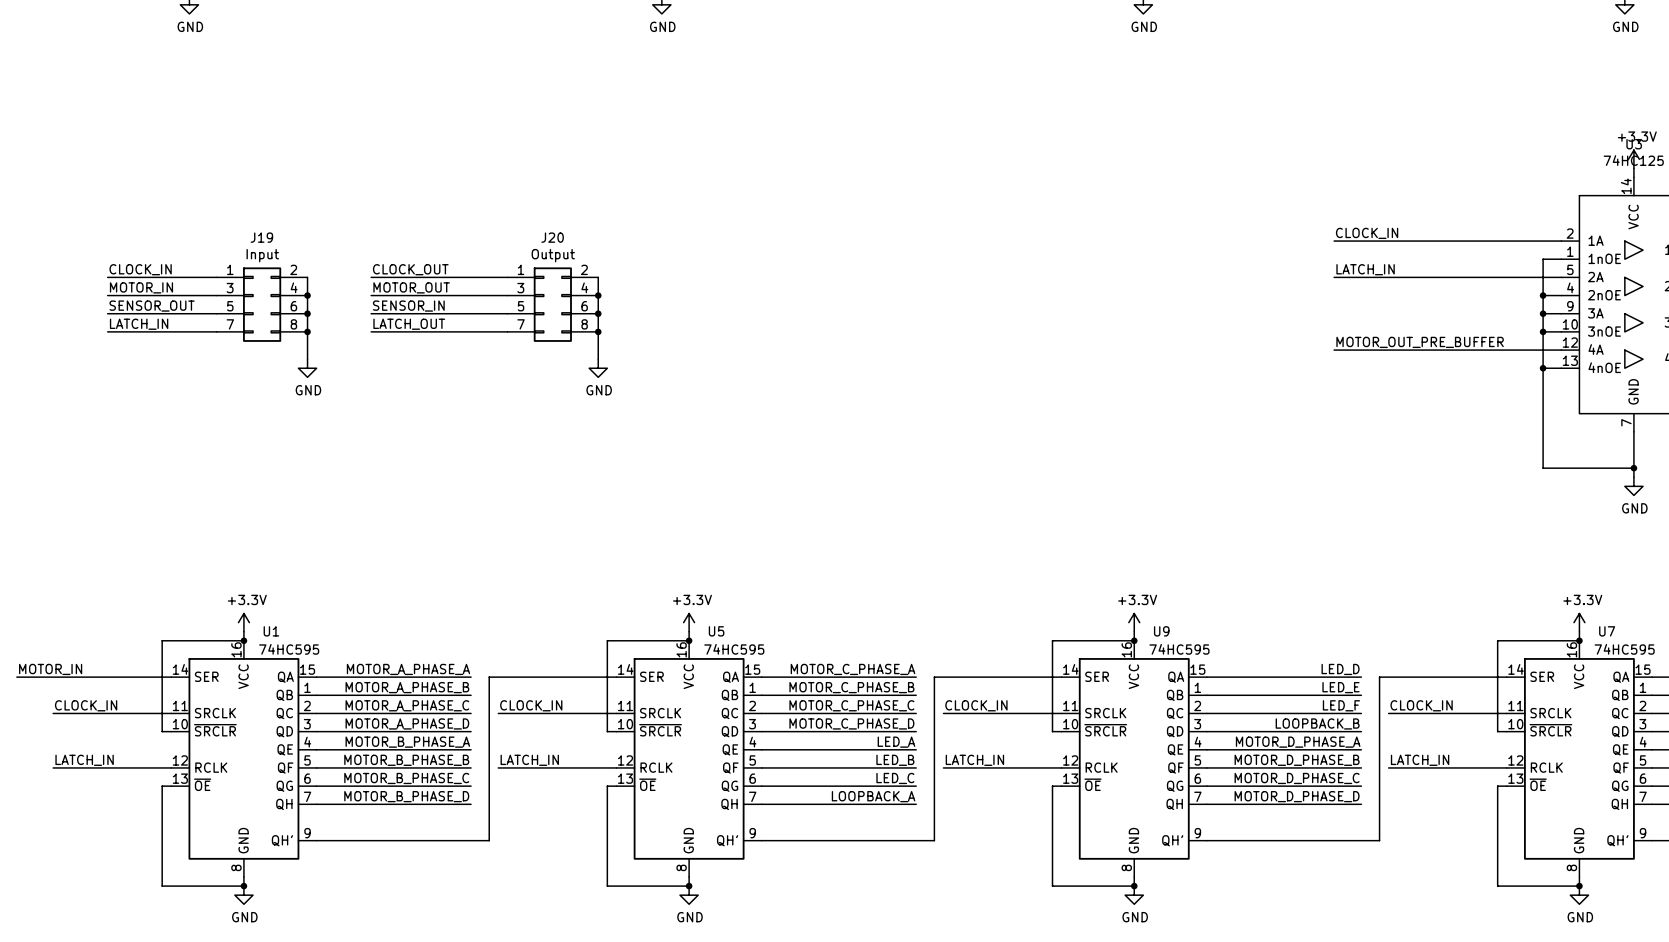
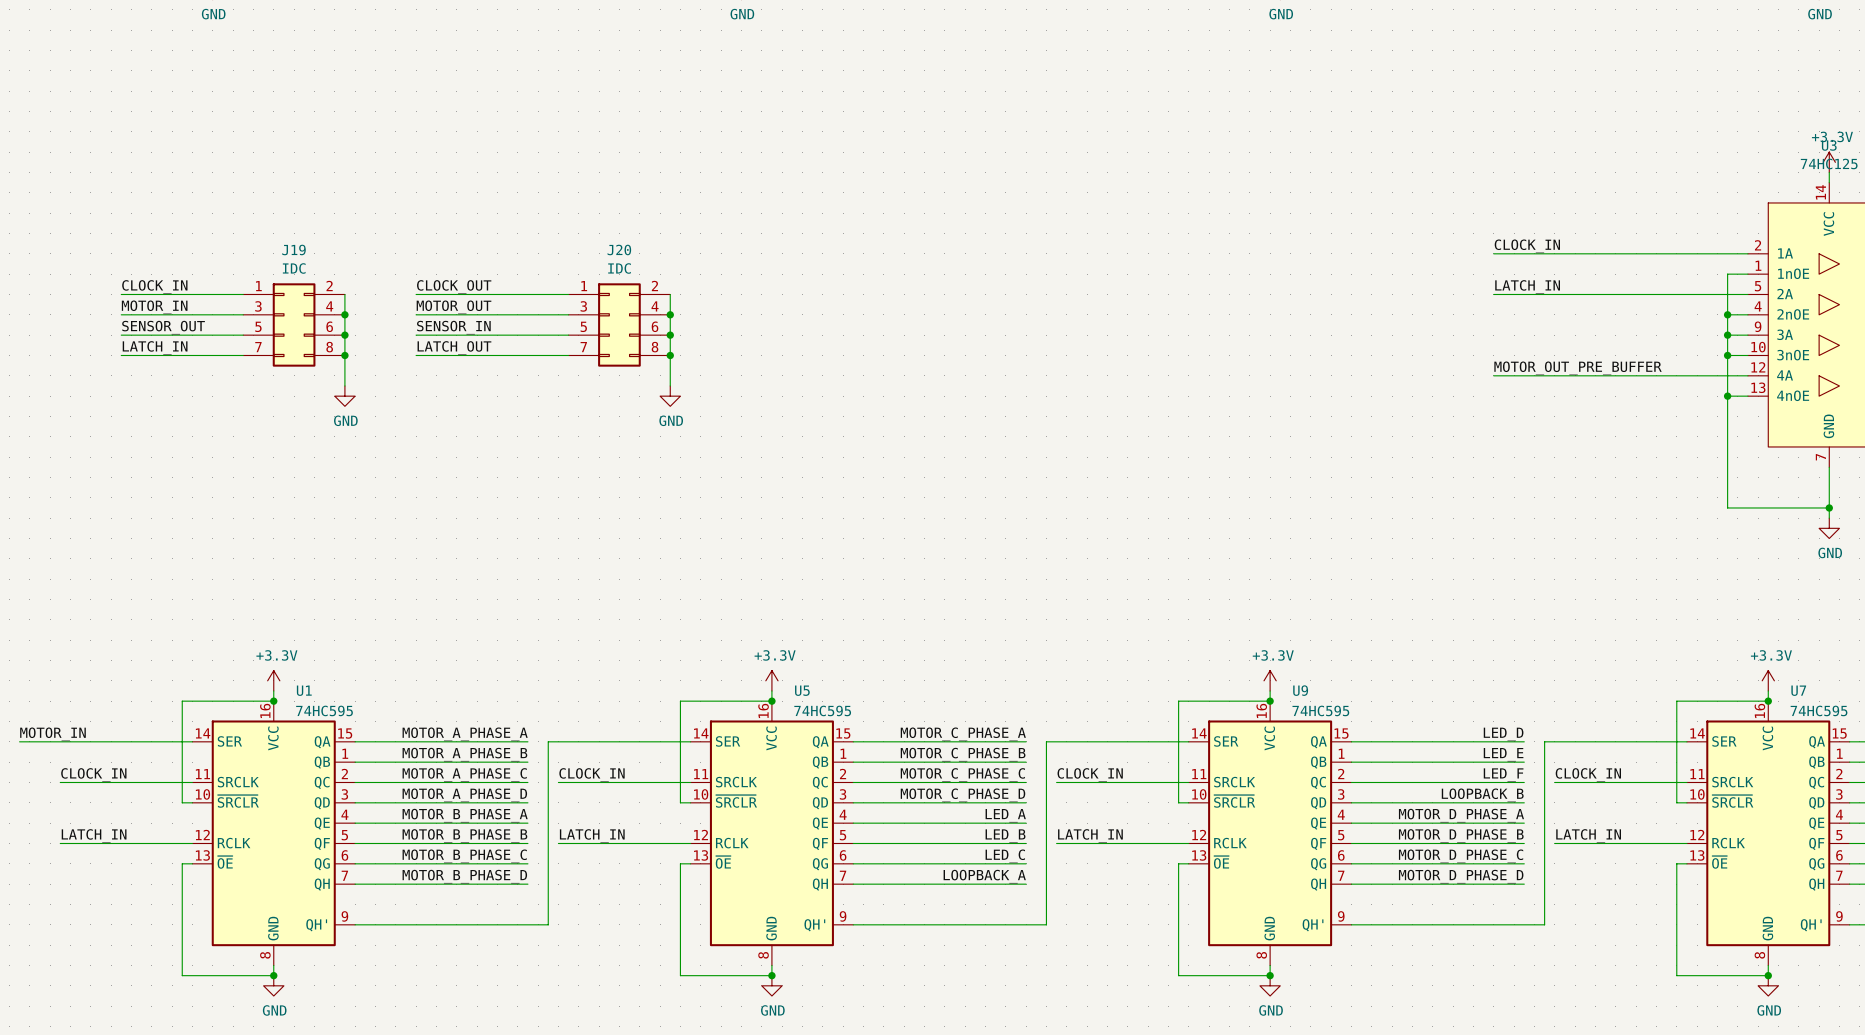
J19 value: Input (262, 255) -> IDC (294, 268)
J20 value: Output (553, 255) -> IDC (619, 268)

